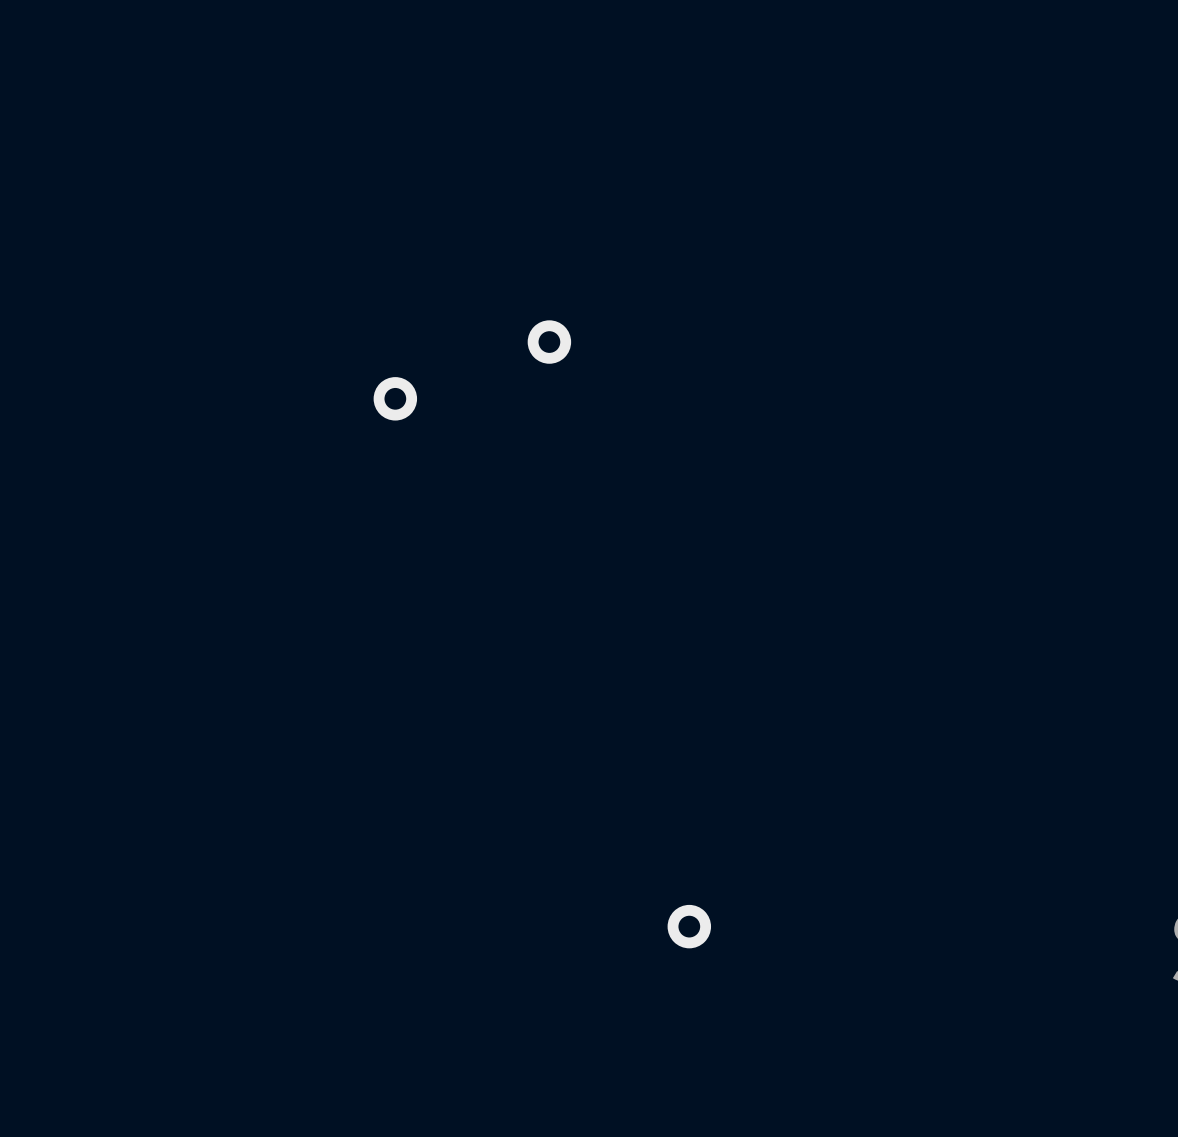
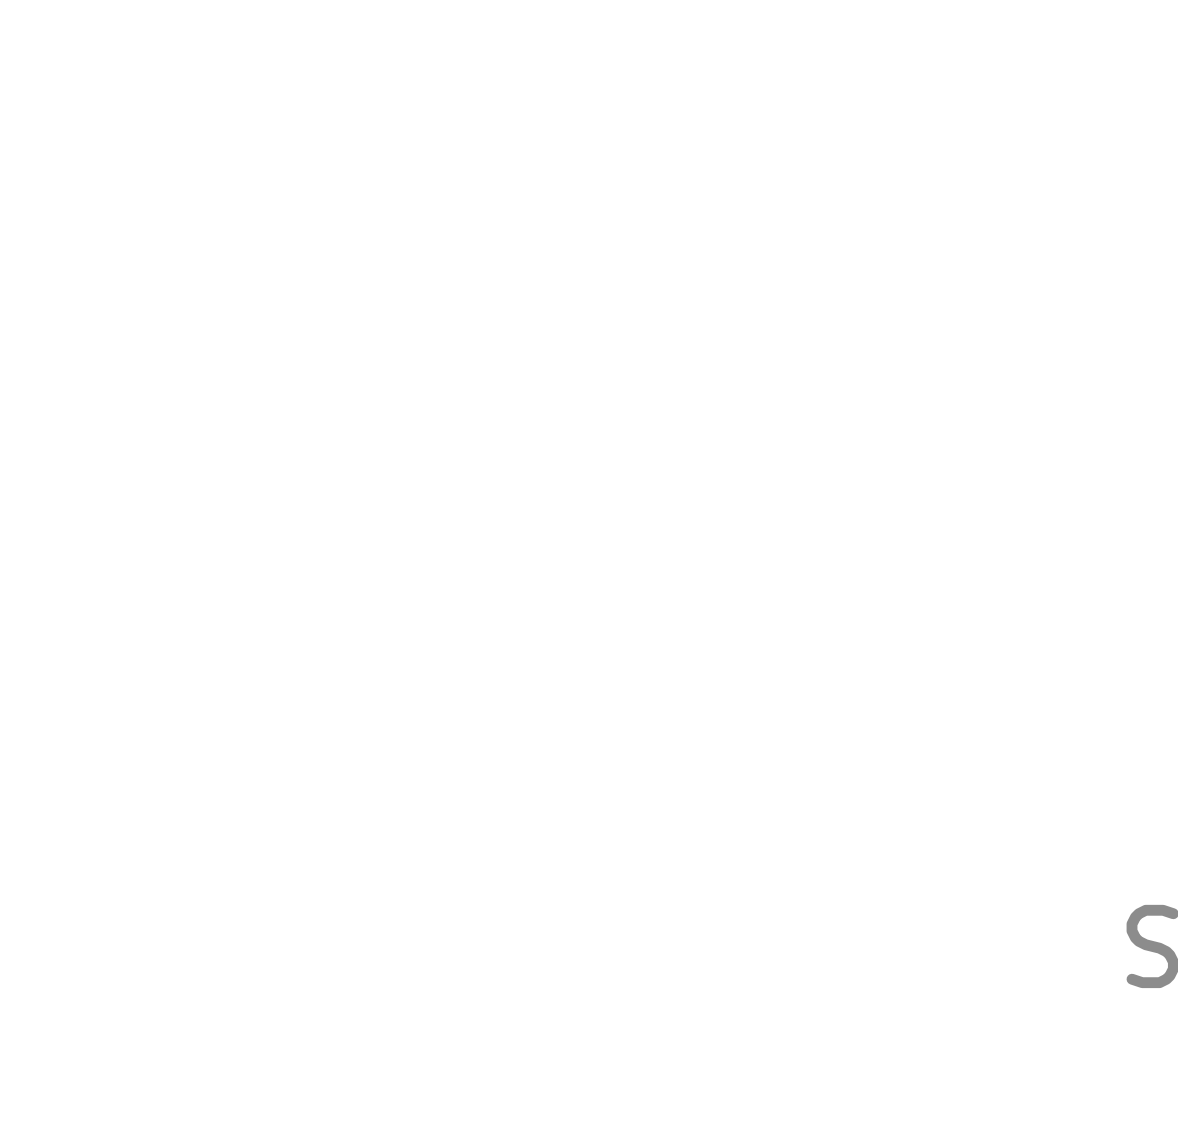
via: (549, 342) -> none
via: (395, 398) -> none
via: (689, 926) -> none

